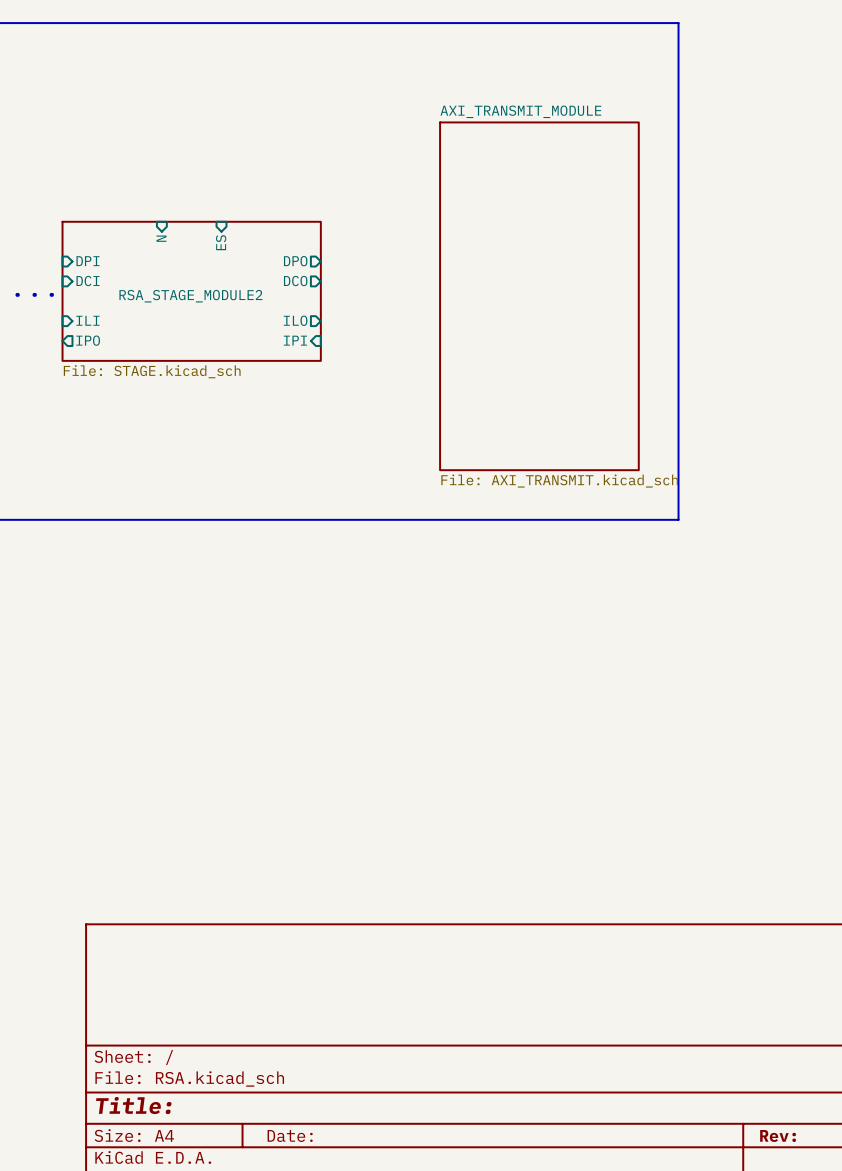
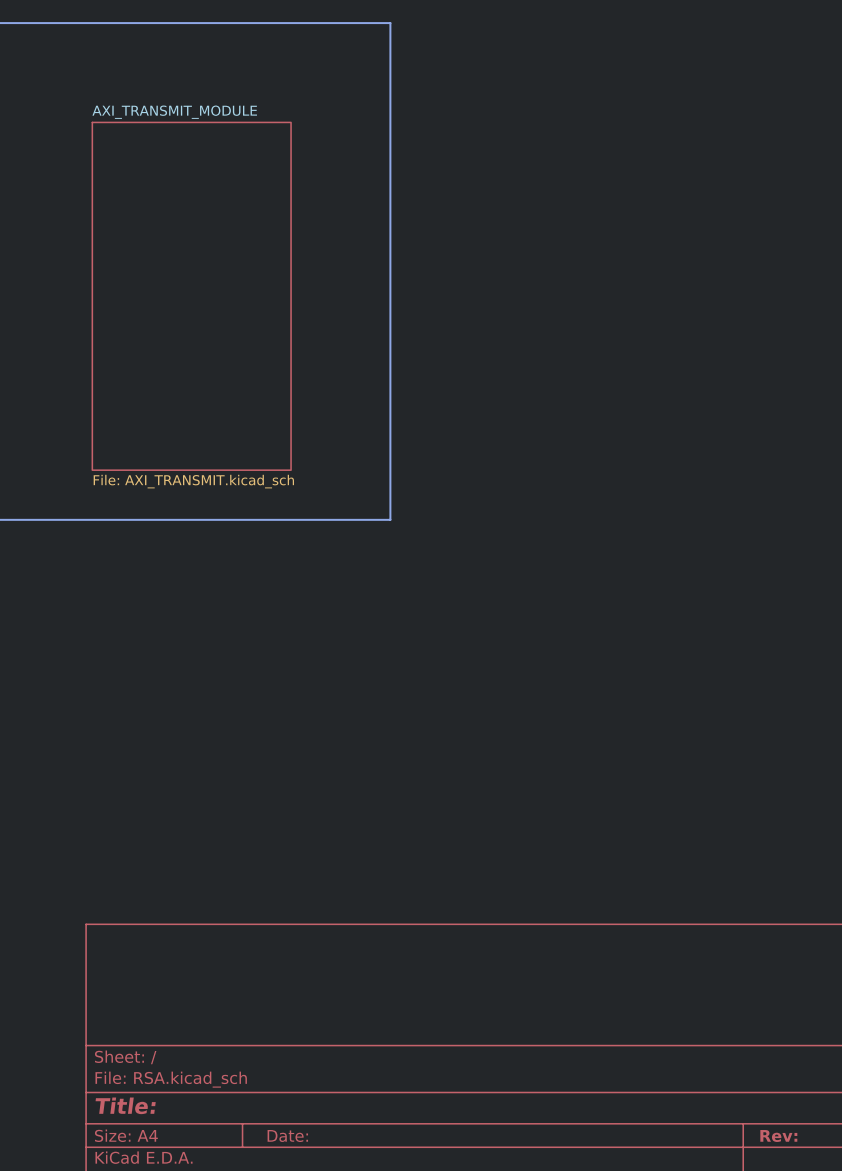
line: (390, 23) (678, 23) (678, 519) (390, 519) -> (390, 23) (390, 519)
sheet pin: N (161, 238) -> none
sheet pin: ES (221, 242) -> none
sheet pin: DPI (88, 261) -> none
sheet pin: DPO (295, 261) -> none
sheet pin: DCI (88, 281) -> none
sheet pin: DCO (295, 281) -> none
sheet RSA_STAGE_MODULE2: File: STAGE.kicad_sch (191, 291) -> none
text: ... (34, 294) -> none
sheet AXI_TRANSMIT_MODULE: none -> File: AXI_TRANSMIT.kicad_sch (191, 296)
sheet AXI_TRANSMIT_MODULE: File: AXI_TRANSMIT.kicad_sch (539, 296) -> none
sheet pin: ILI (87, 320) -> none
sheet pin: ILO (295, 320) -> none
sheet pin: IPO (88, 340) -> none
sheet pin: IPI (295, 340) -> none

